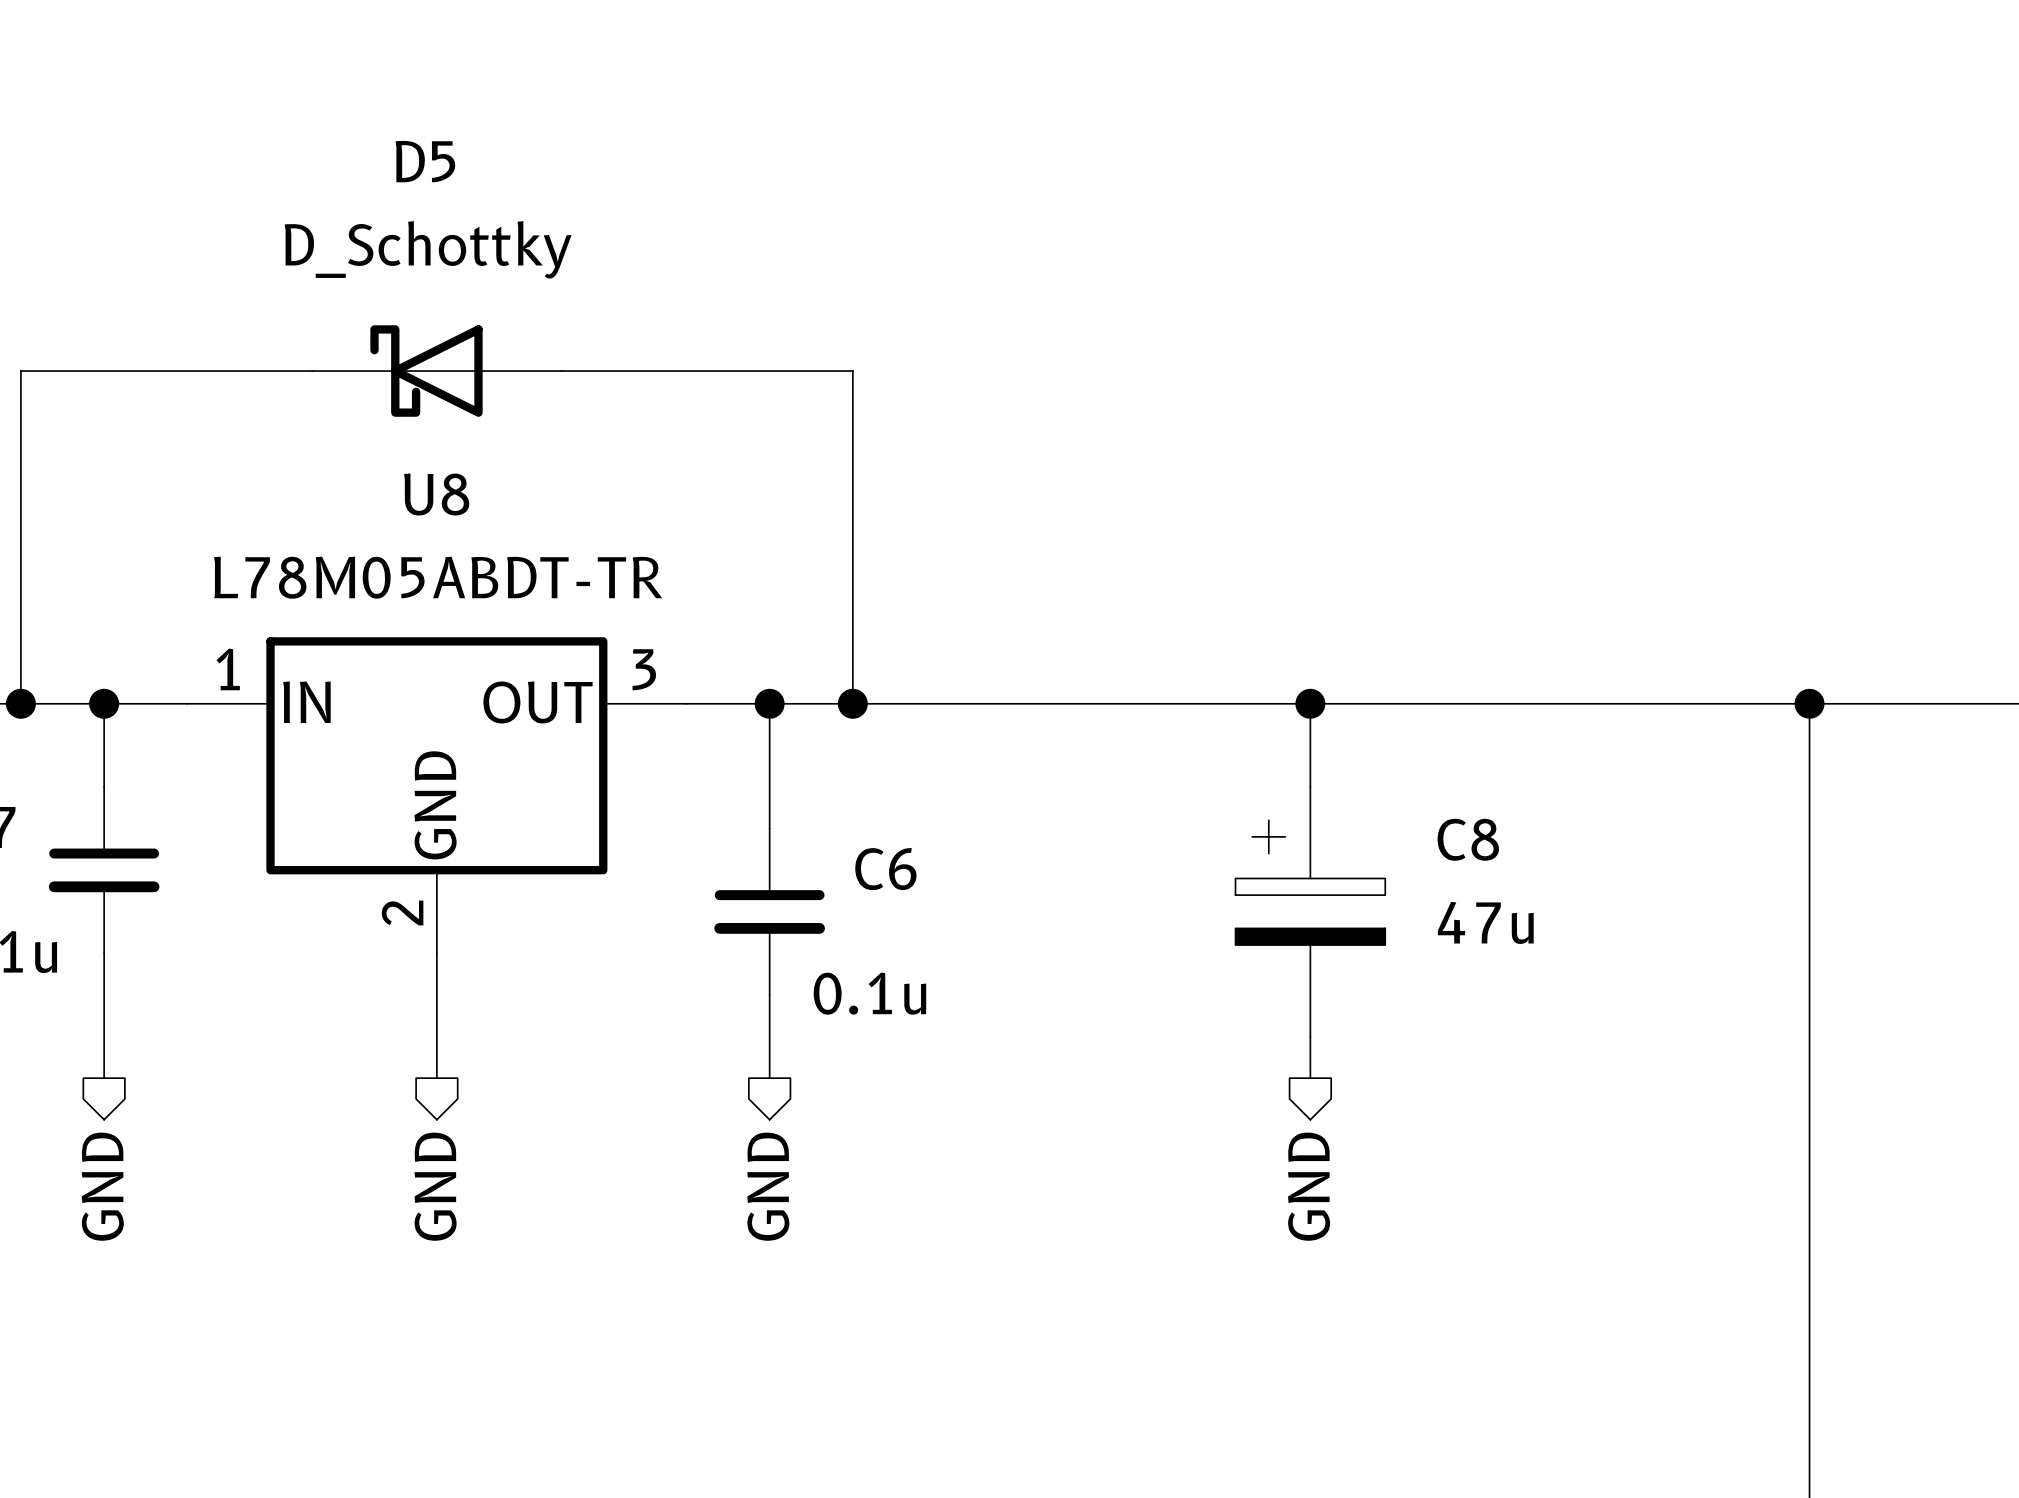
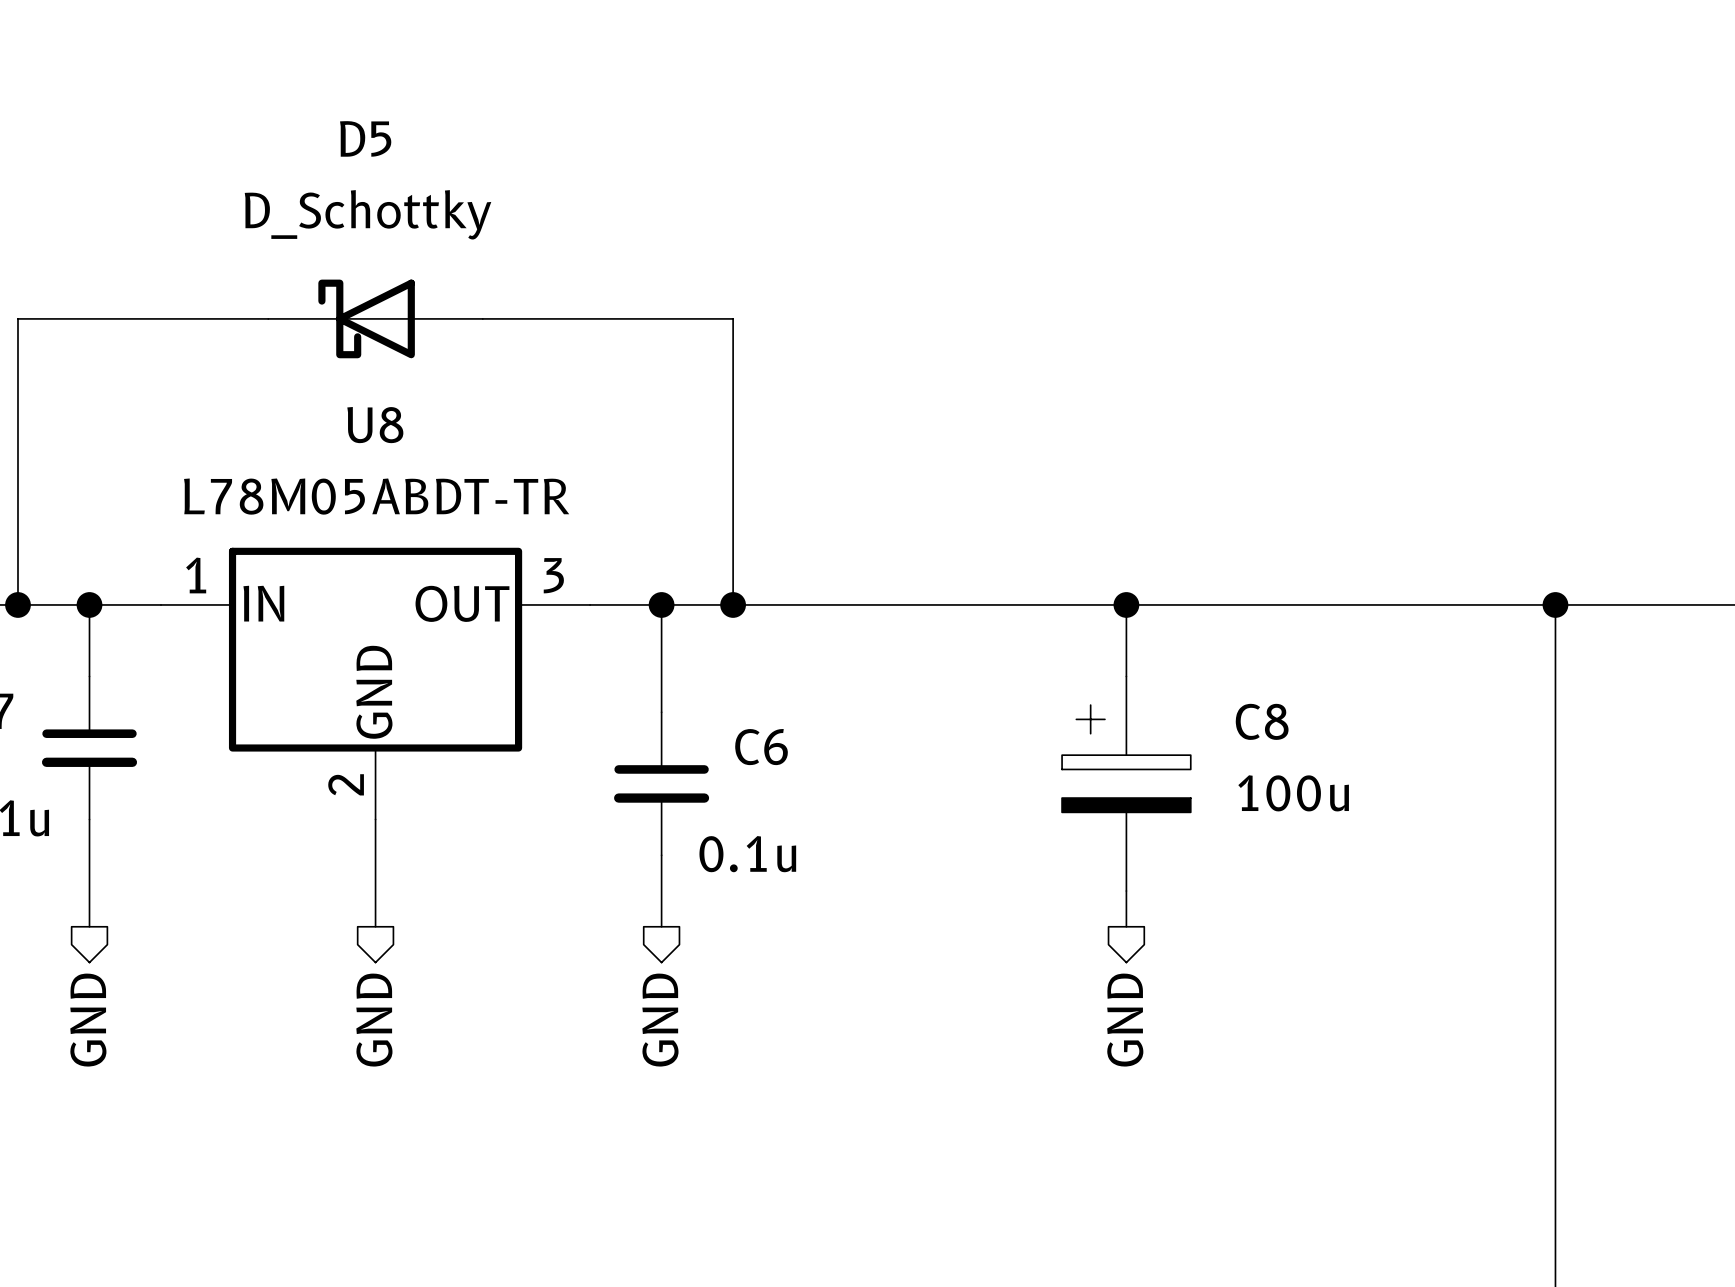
C8 value: 47u (1485, 922) -> 100u (1293, 793)

